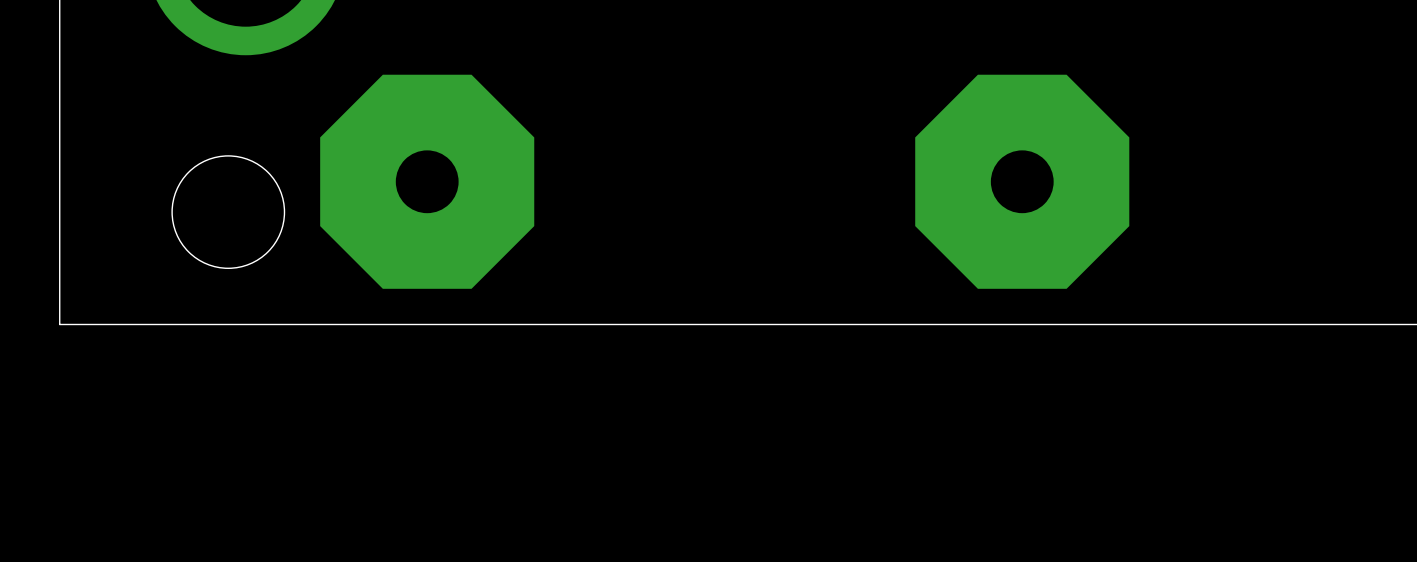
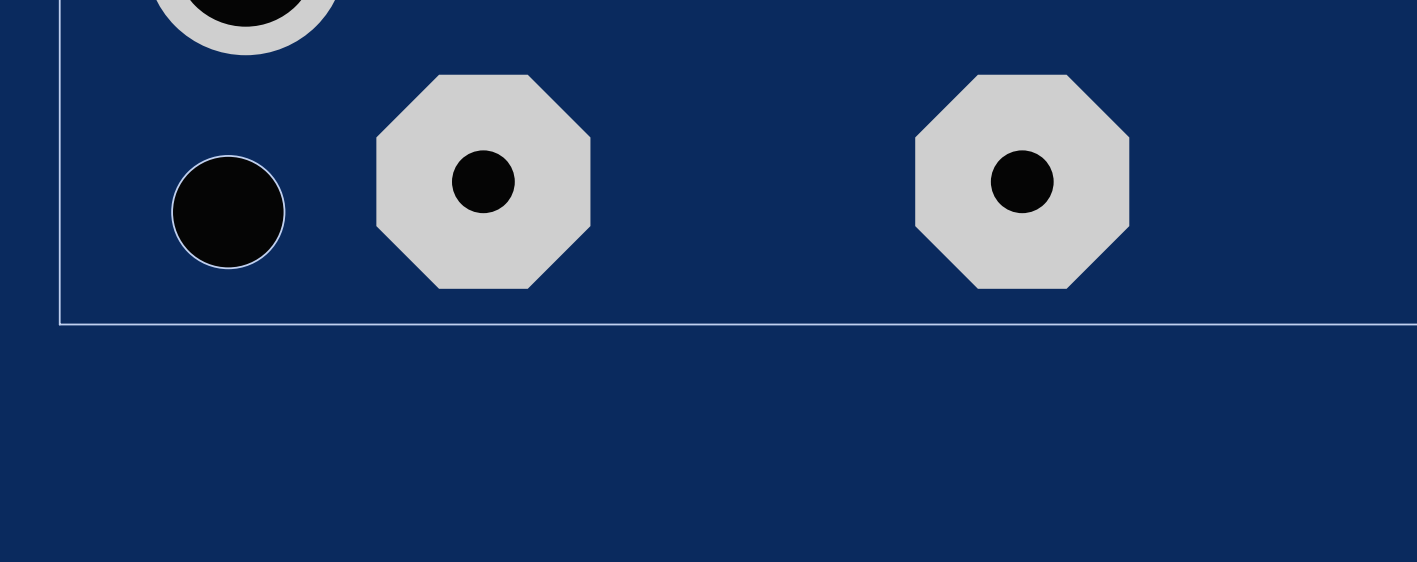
part position: (427, 181) -> (483, 181)

